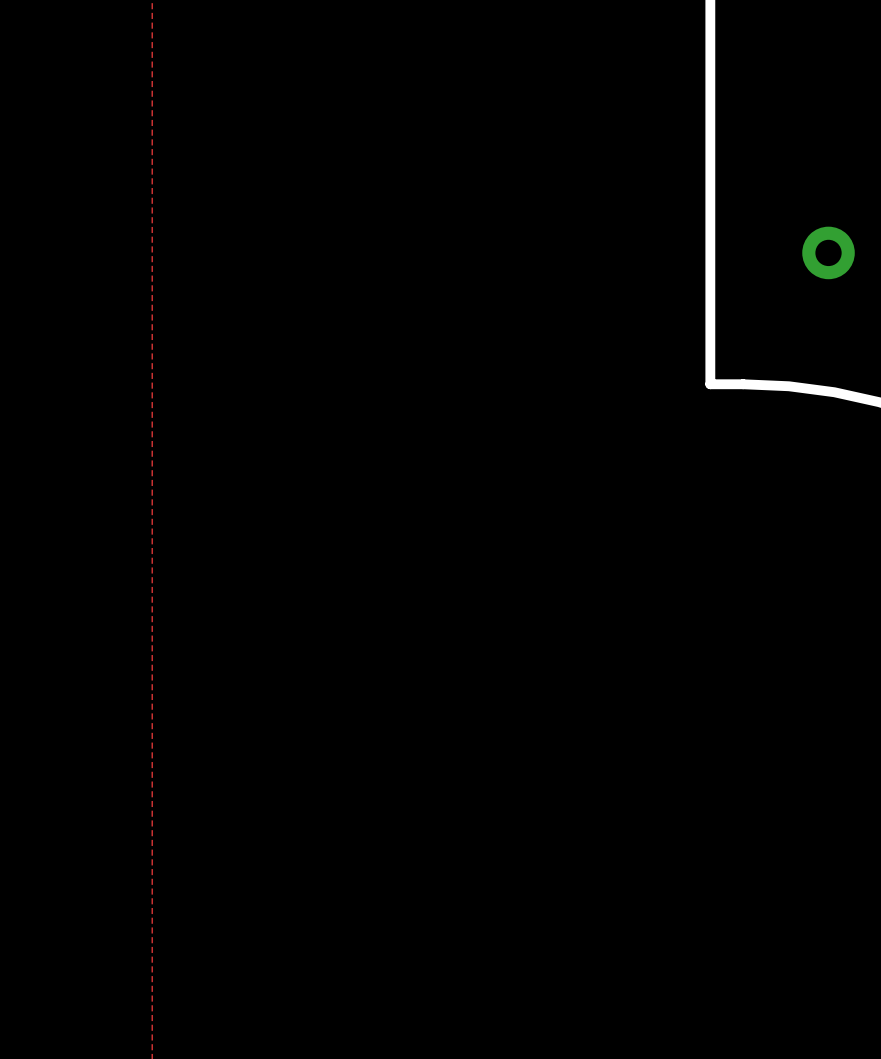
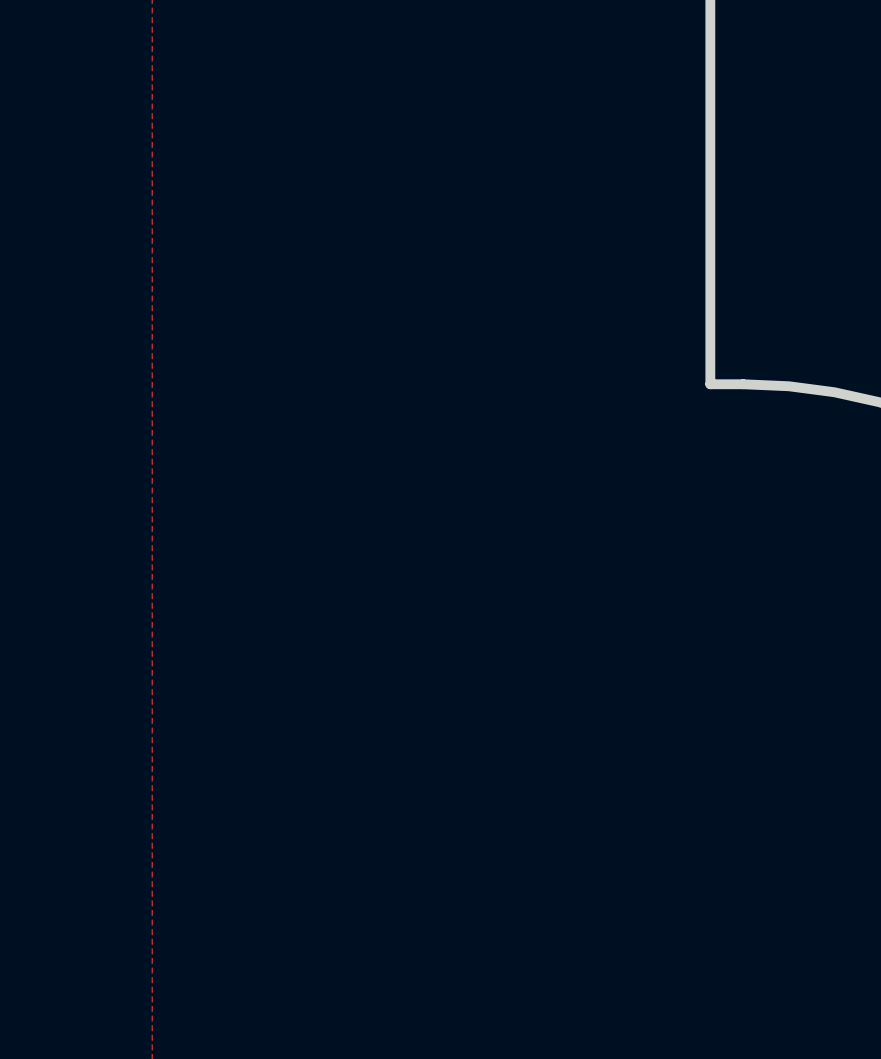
via: (828, 252) -> none

